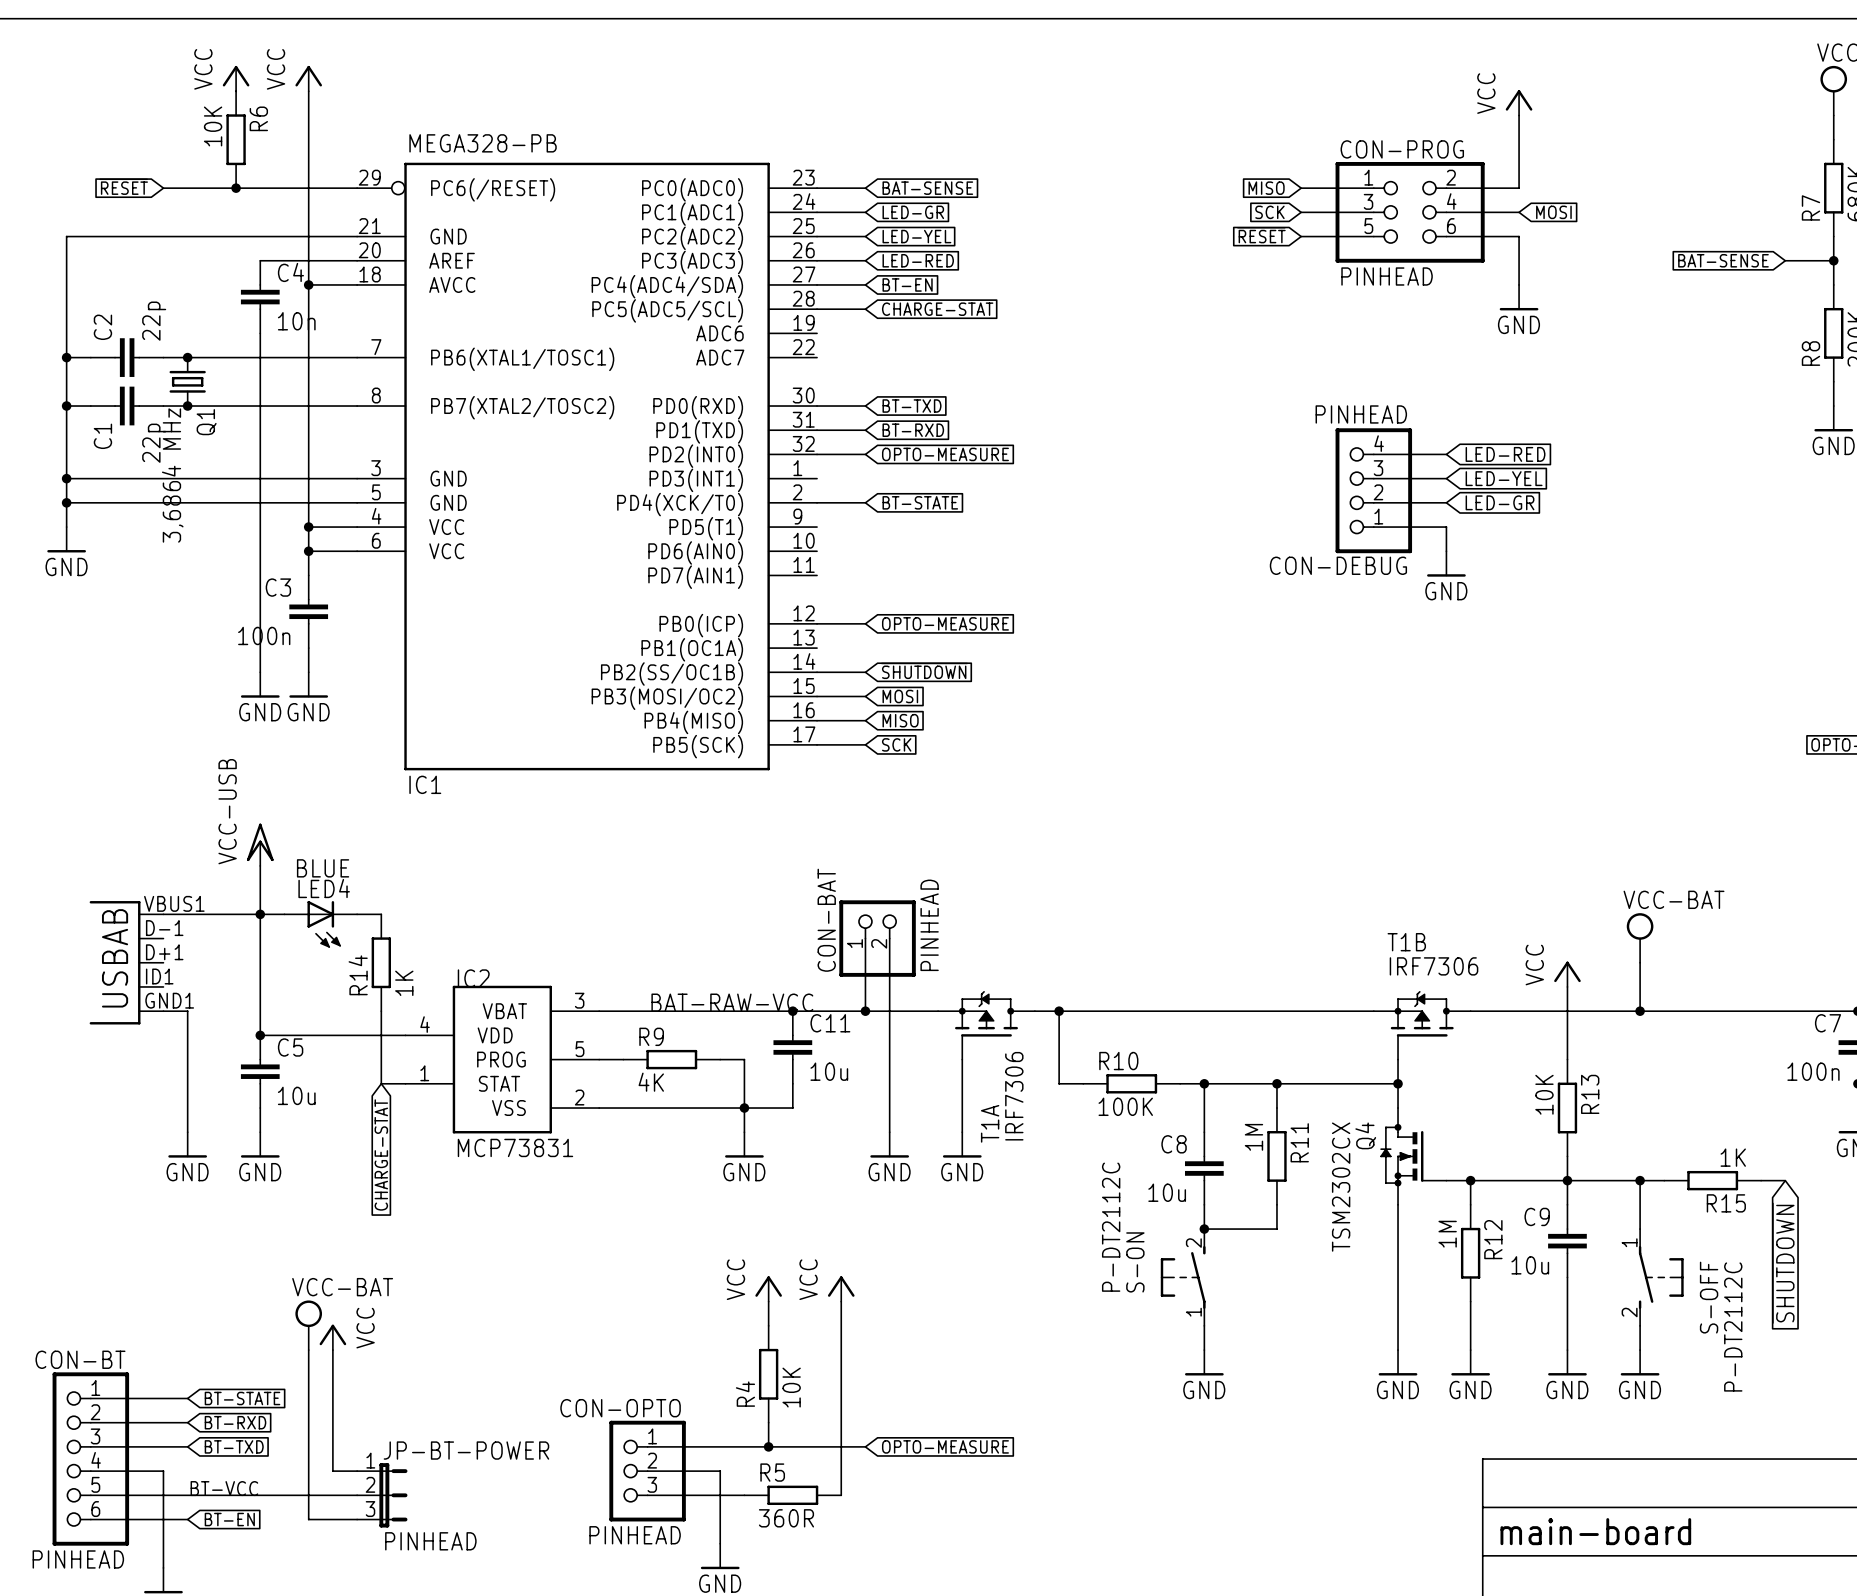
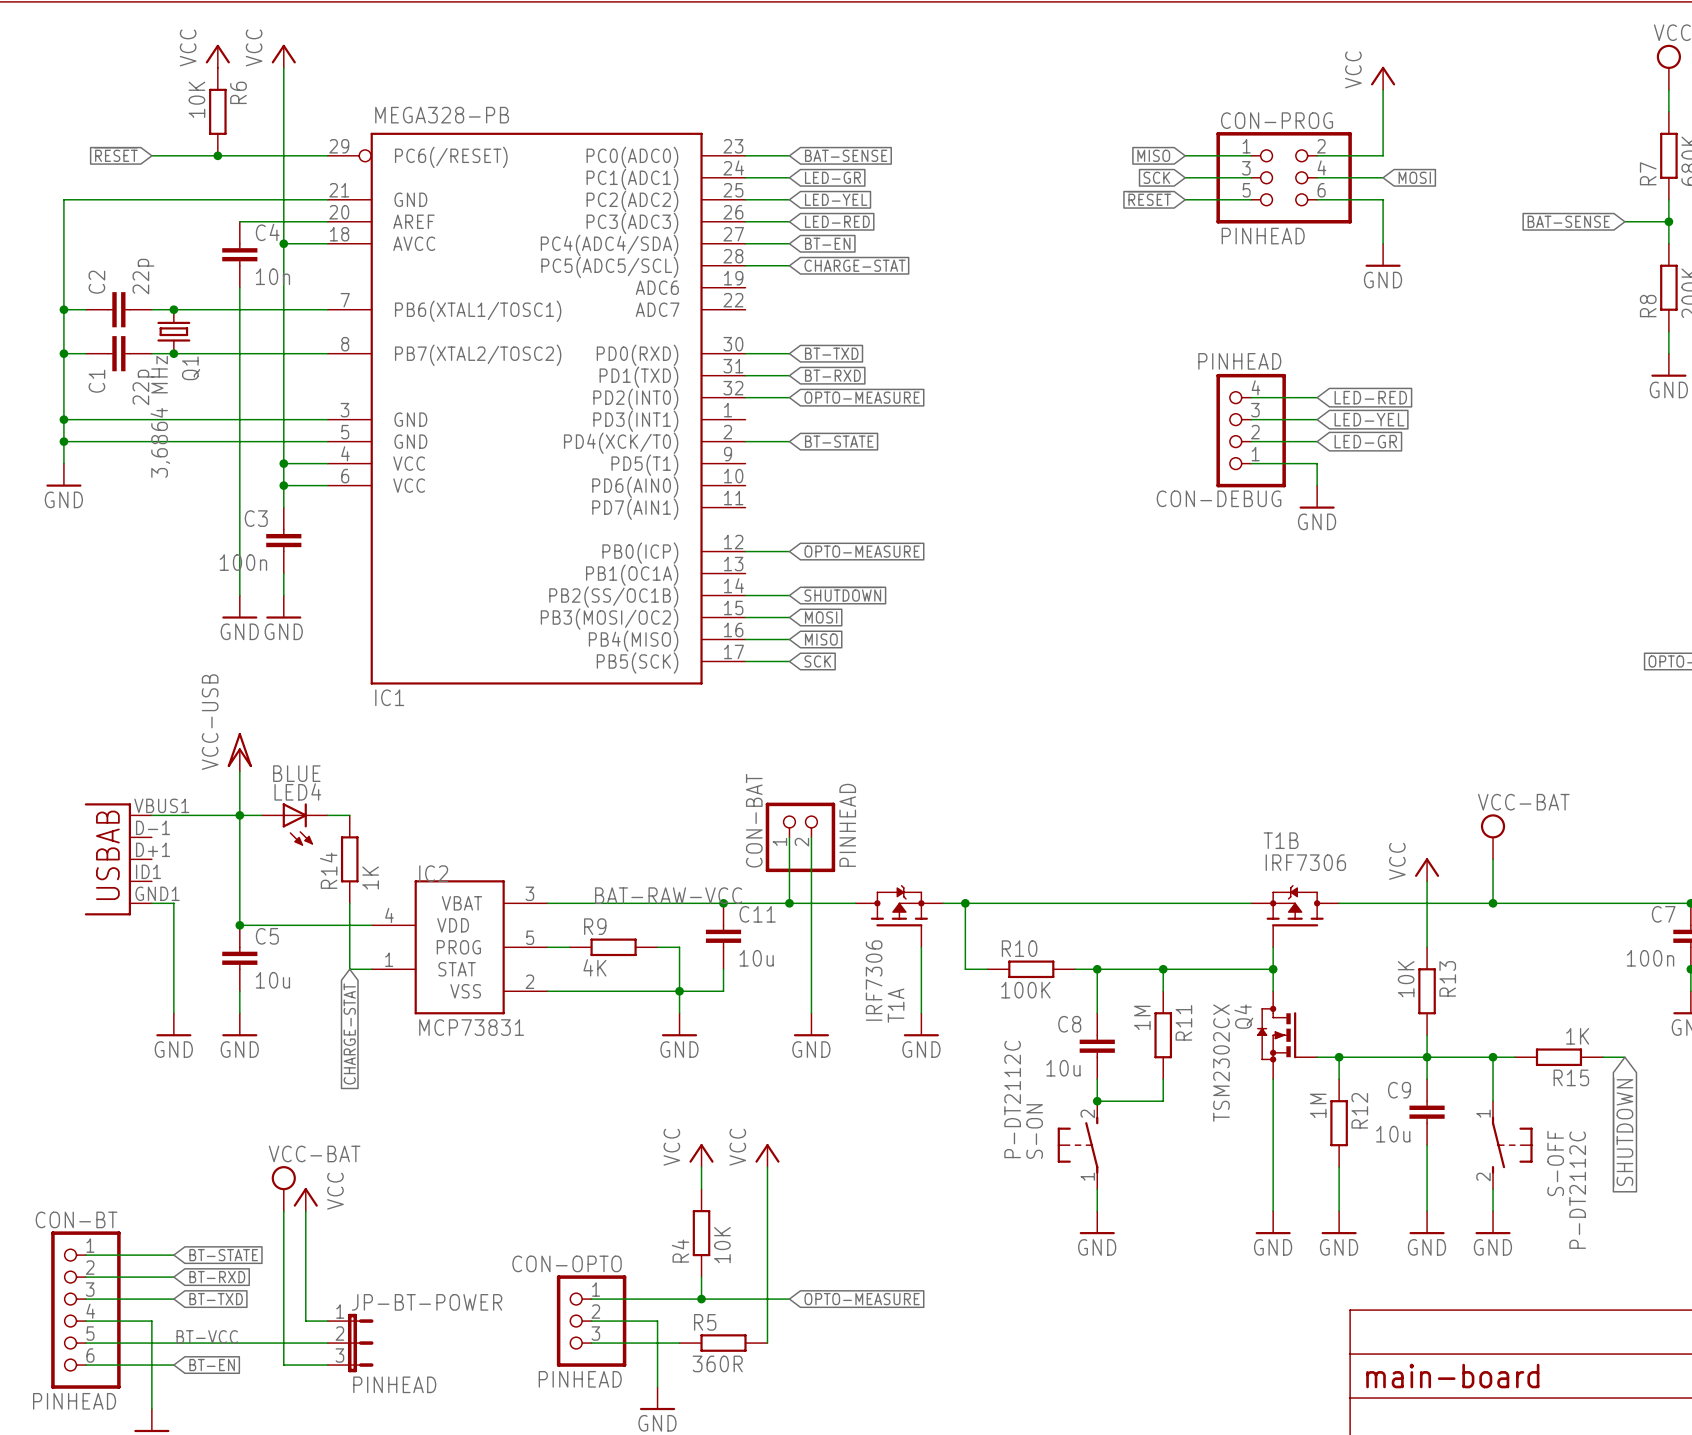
T1A flip: as is (986, 1013) -> left-right (899, 905)
wire: (962, 1059) (962, 1132) -> (921, 947) (921, 1013)
power symbol position: GND (962, 1144) -> GND (921, 1024)
power symbol text position: GND (962, 1172) -> GND (921, 1049)

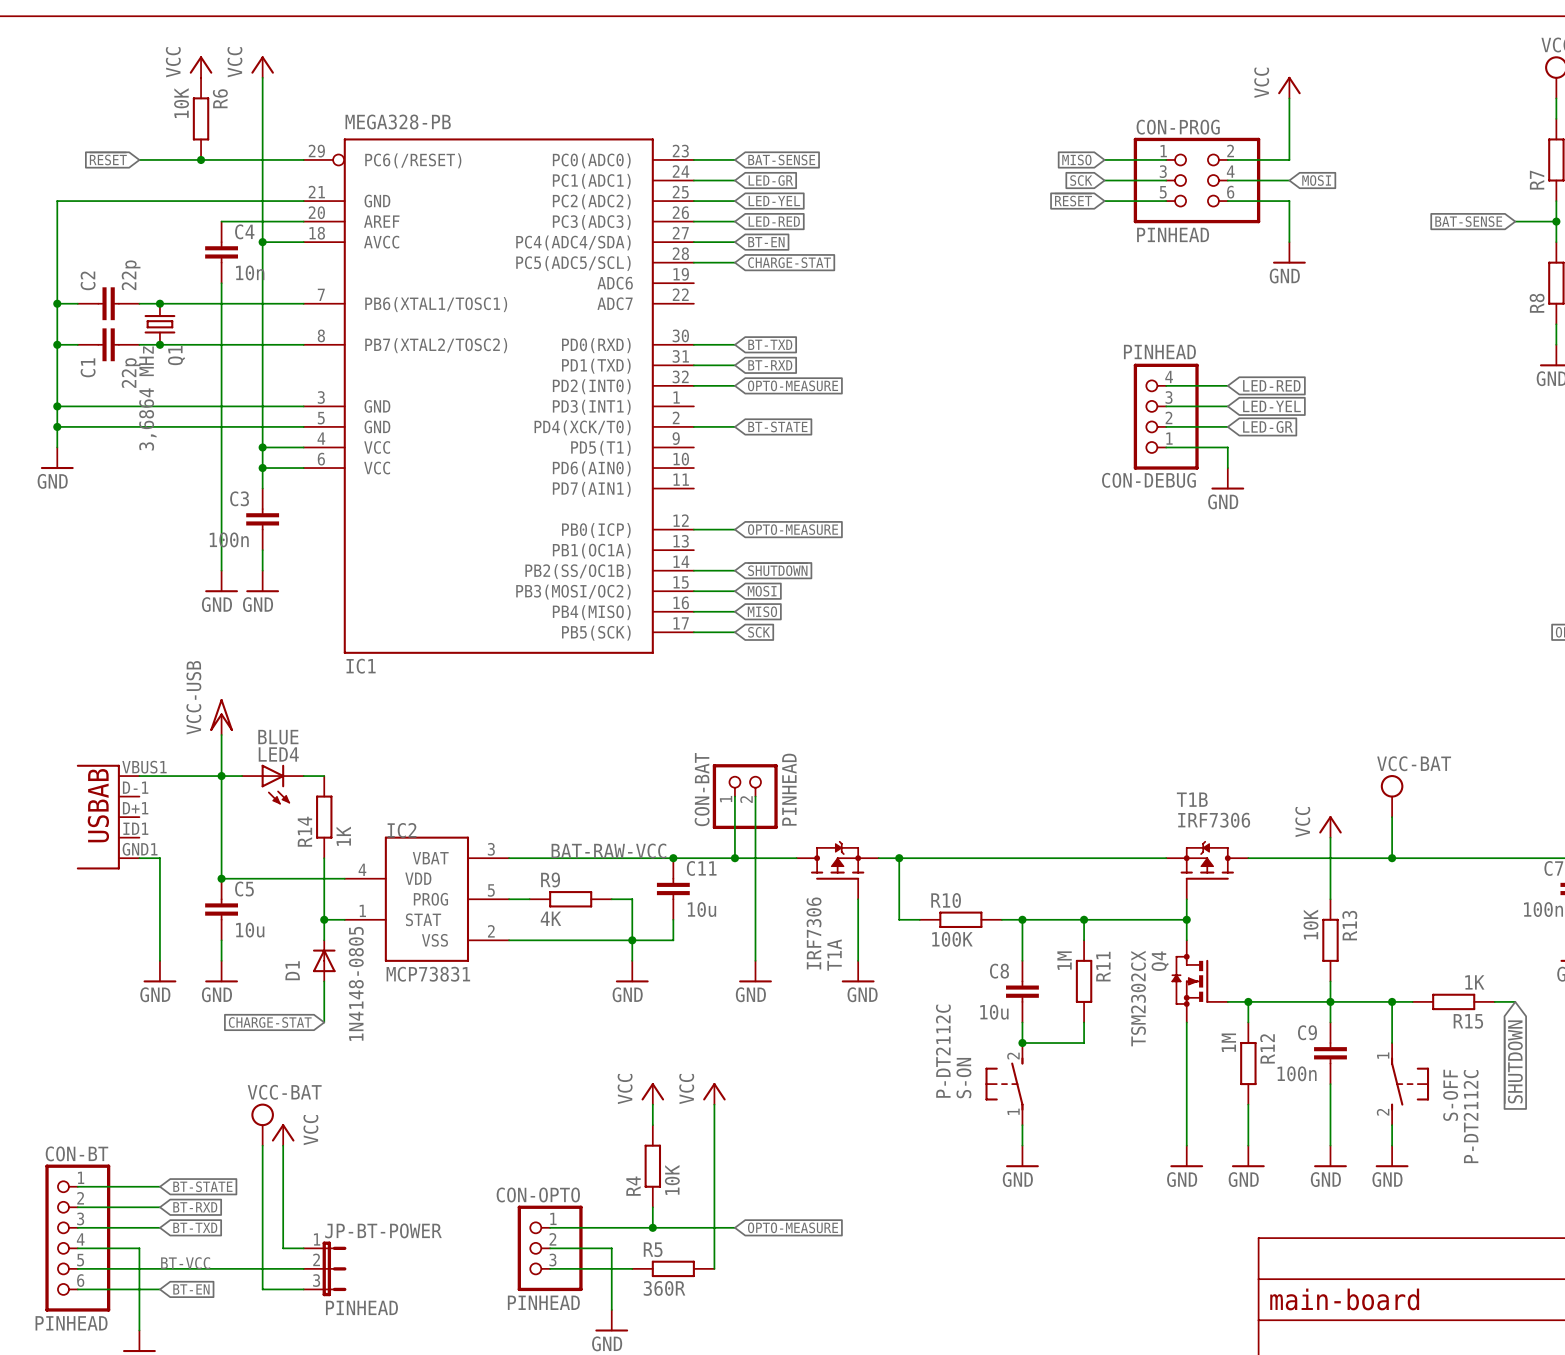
wire: none -> (324, 919) (324, 940)
junction: none -> (324, 919)
D1: none -> 1N4148-0805 (324, 960)
global label rotation: 0° (349, 1033) -> 90° clockwise (270, 1022)
wire: none -> (324, 981) (324, 1022)
C9 value: 10u (1393, 1134) -> 100n (1297, 1073)

